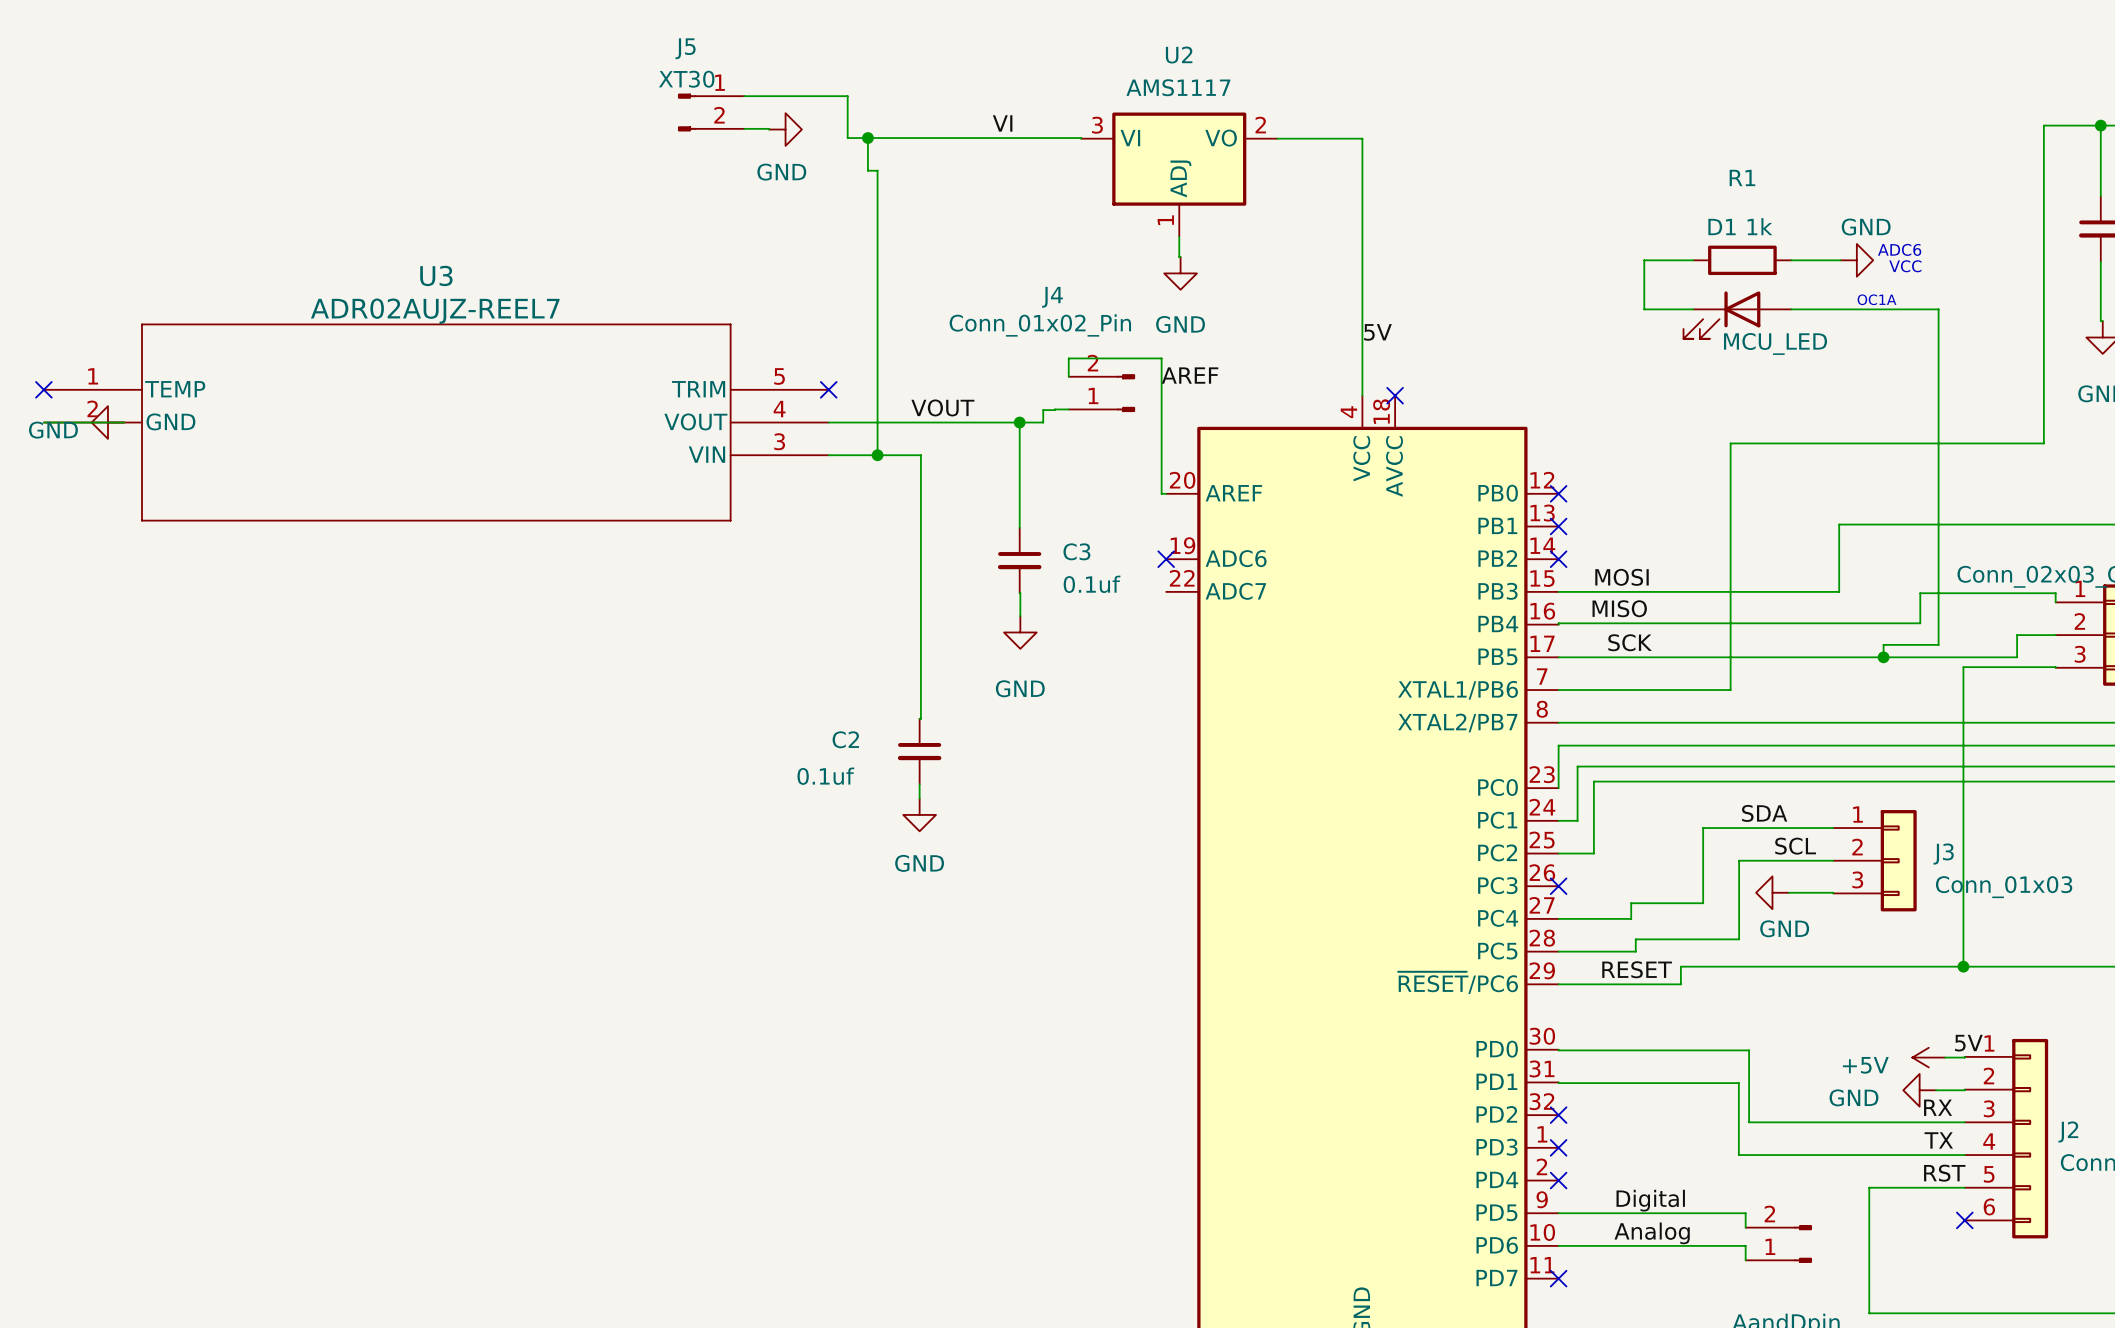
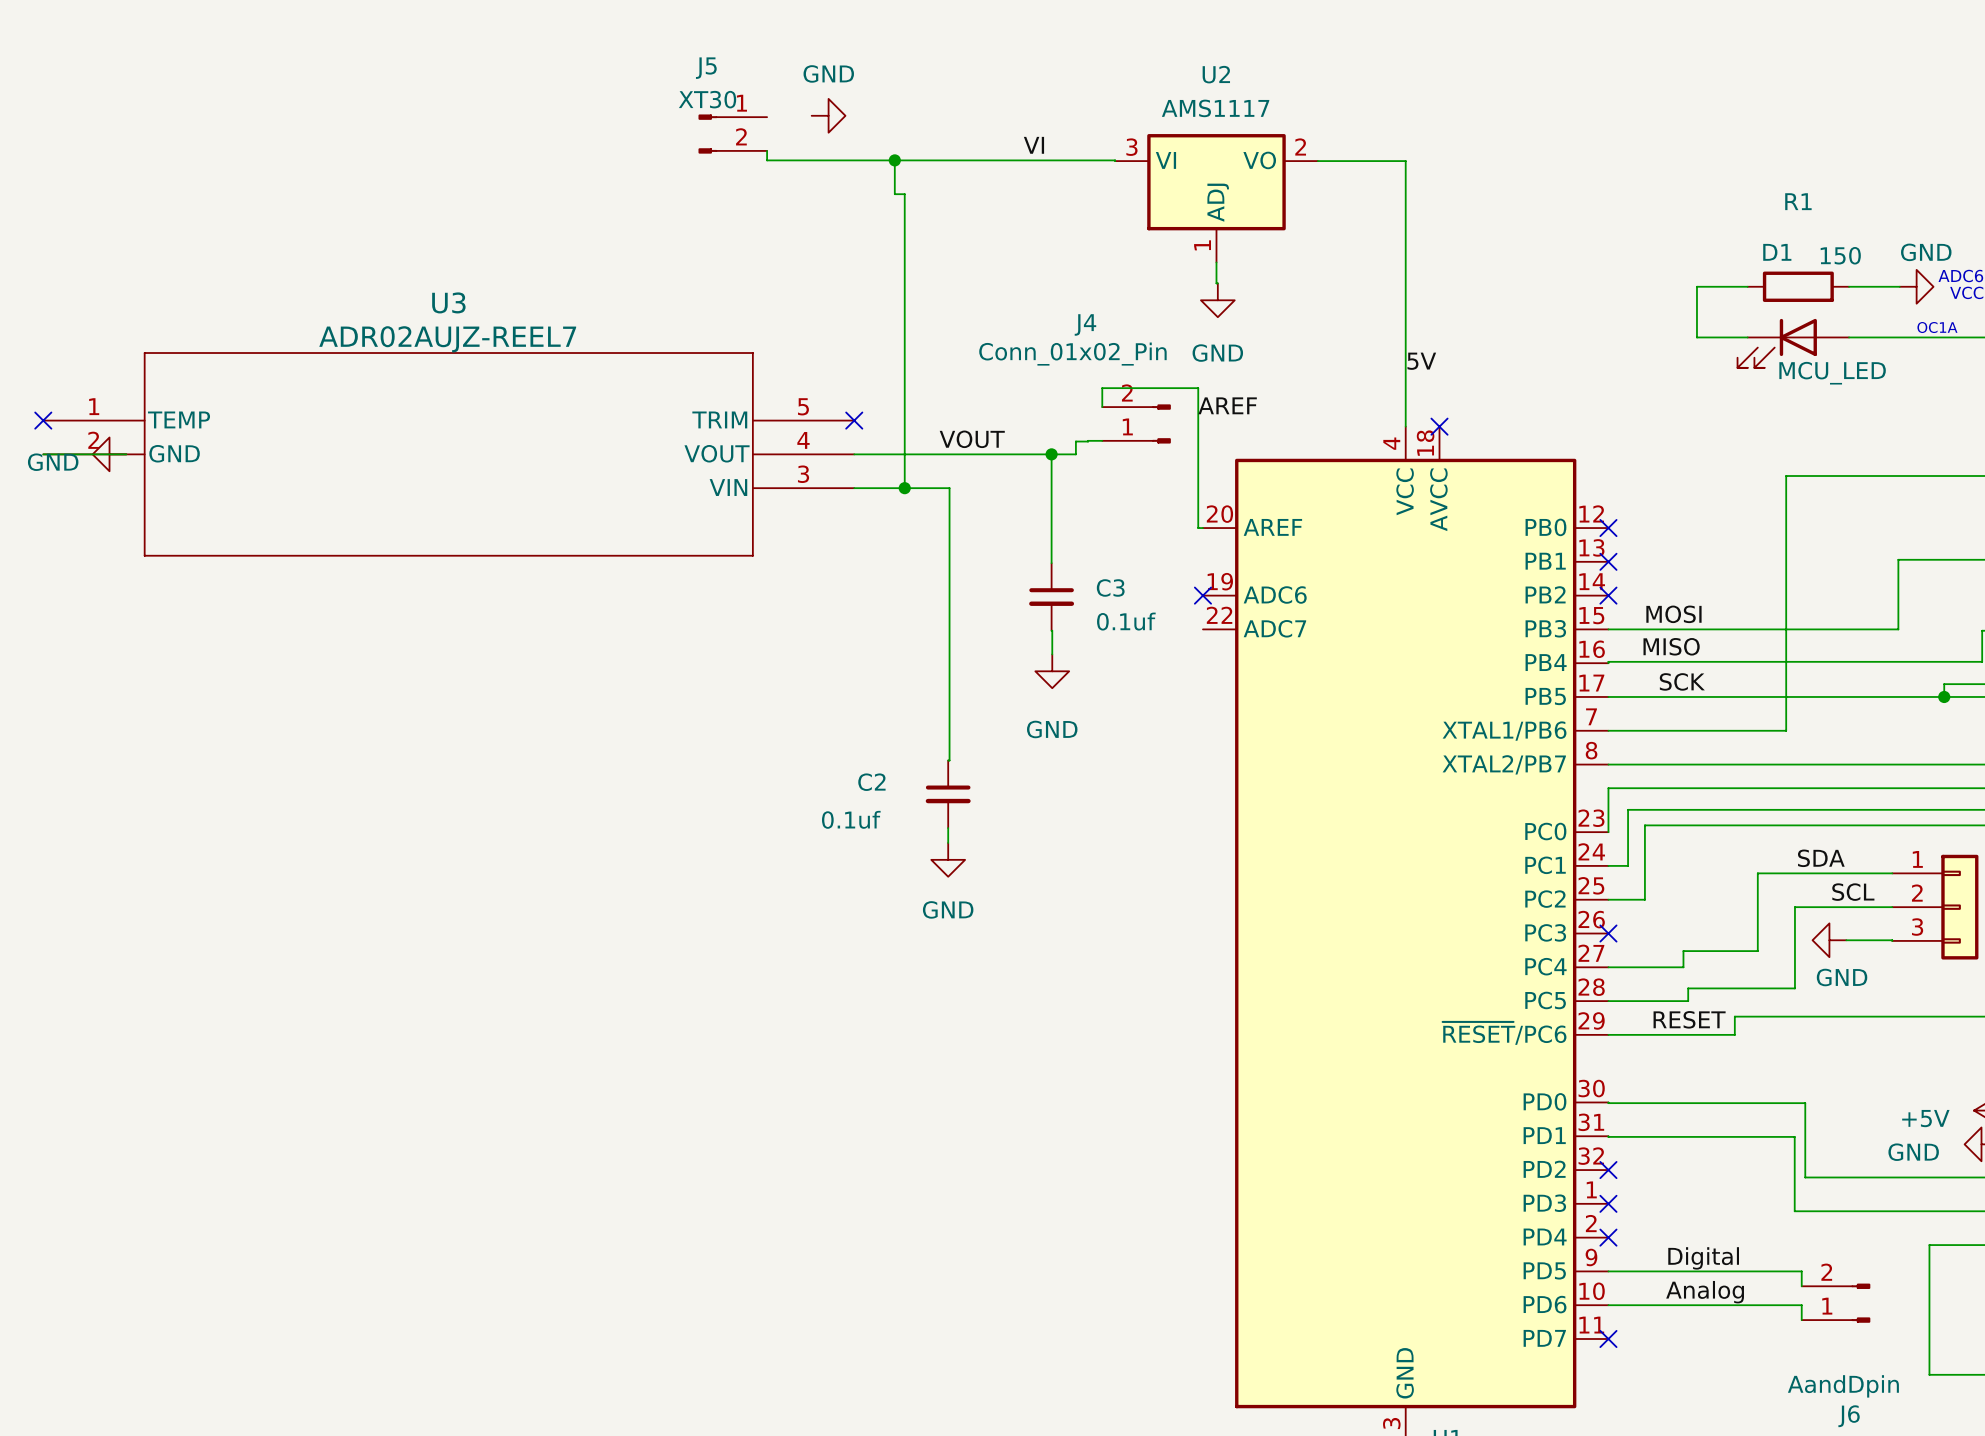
wire: (744, 96) (847, 96) (847, 138) -> (767, 150) (767, 160) (873, 160)
wire: (744, 128) (769, 129) -> none
power symbol position: GND (785, 129) -> GND (828, 115)
power symbol text position: GND (781, 172) -> GND (828, 73)
R1 value: 1k (1759, 226) -> 150 (1840, 255)

